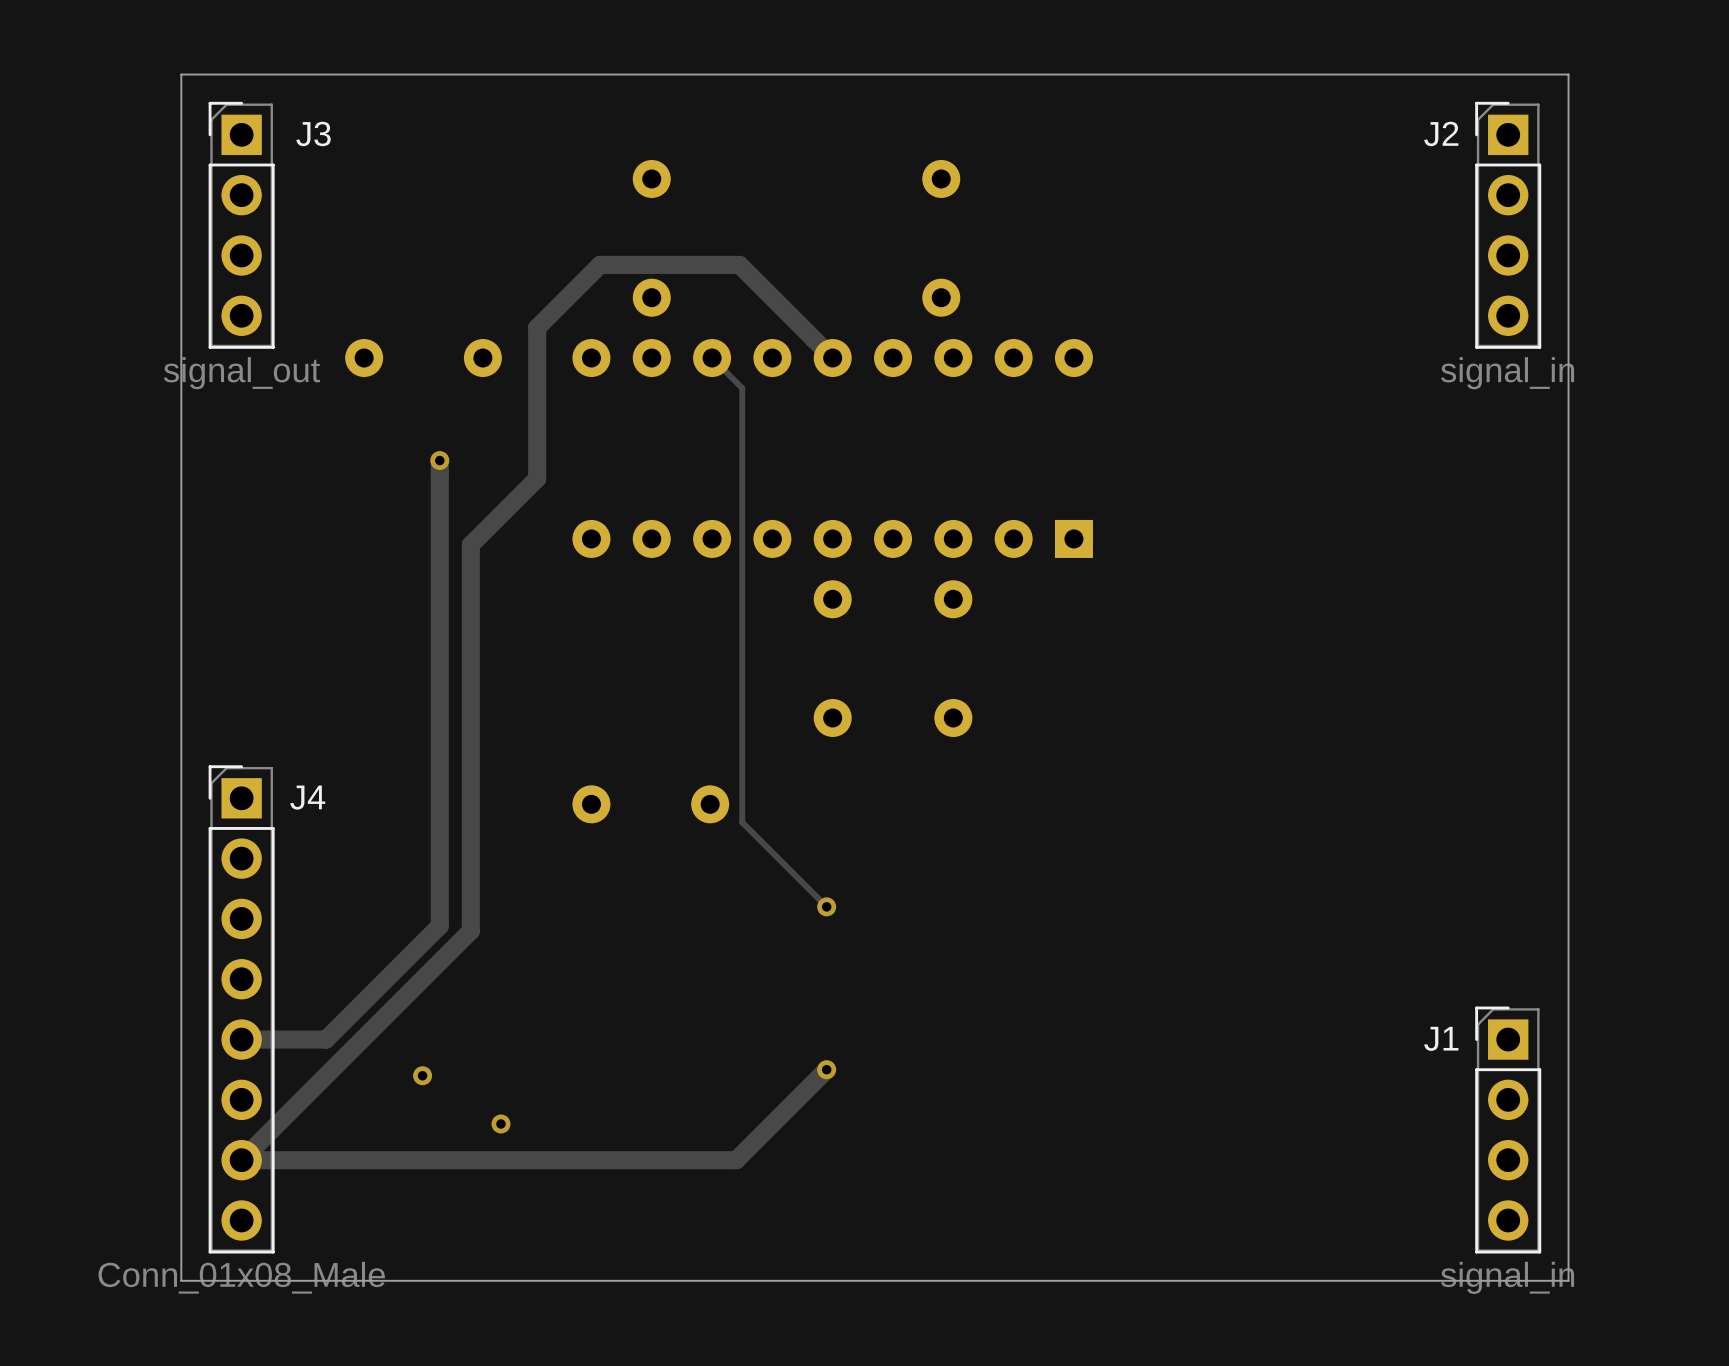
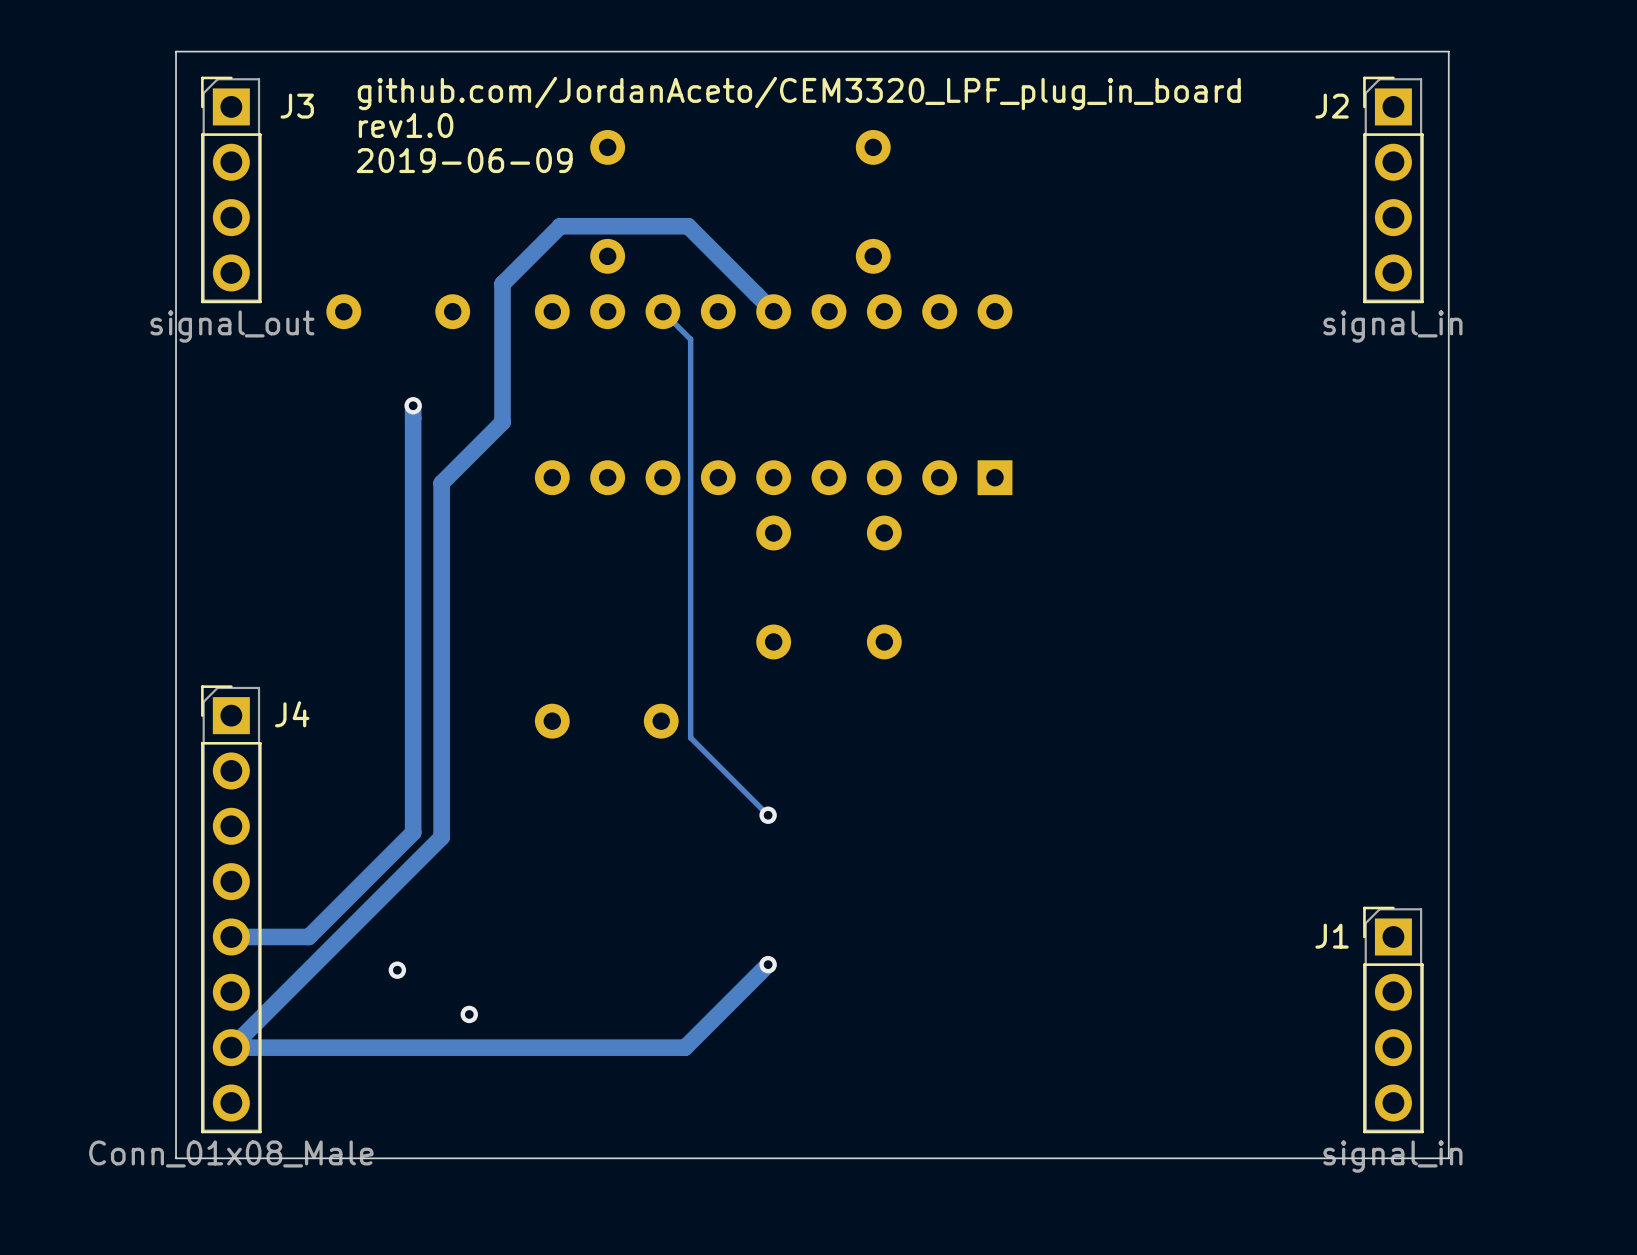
text: none -> github.com/JordanAceto/CEM3320_LPF_plug_in_board (799, 93)
text: none -> rev1.0 (406, 125)
text: none -> 2019-06-09 (464, 160)

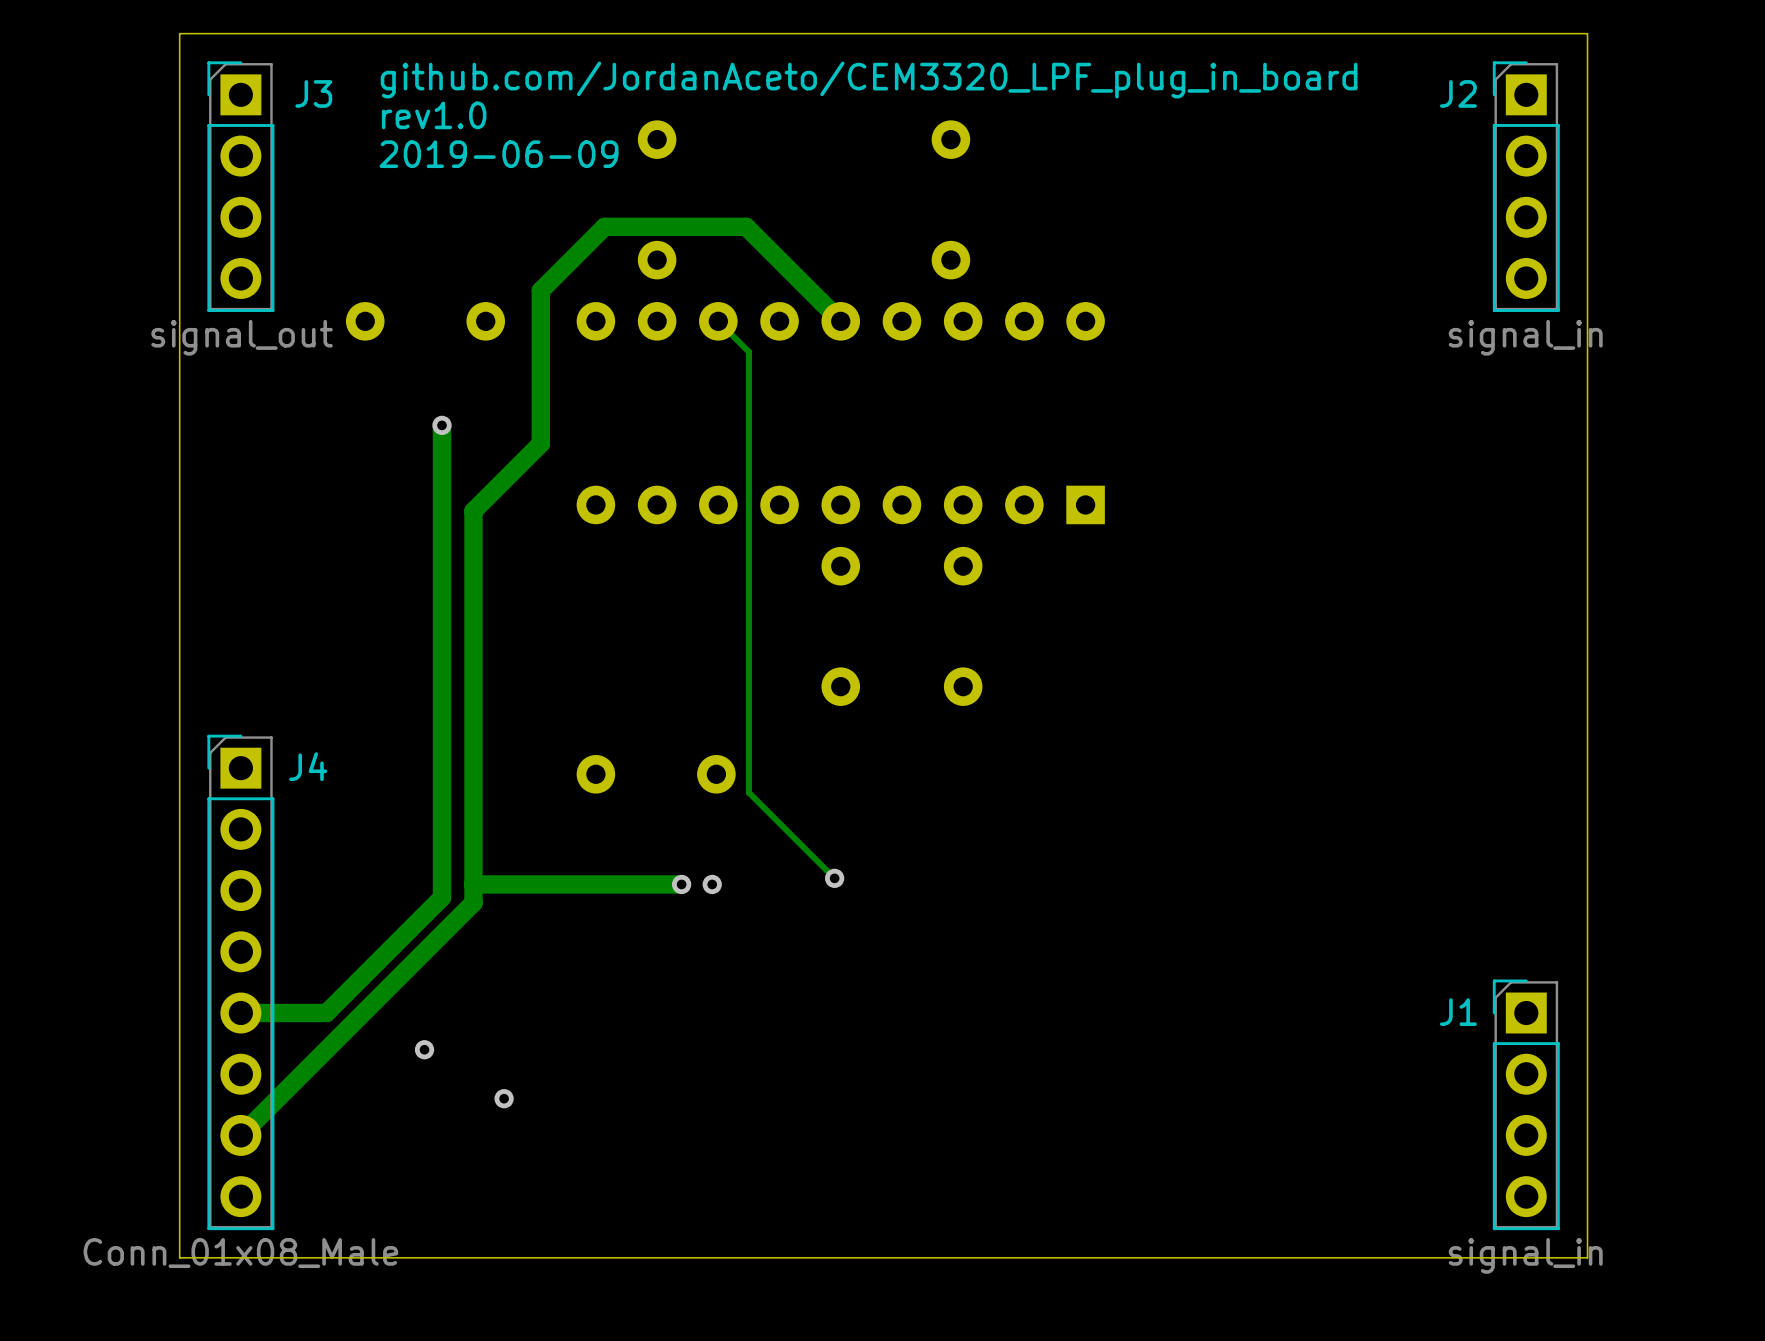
track: none -> (681, 884) (473, 884)
via: none -> (681, 884)
via: none -> (712, 884)
track: (768, 964) (685, 1047) (231, 1047) -> none
via: (768, 964) -> none

